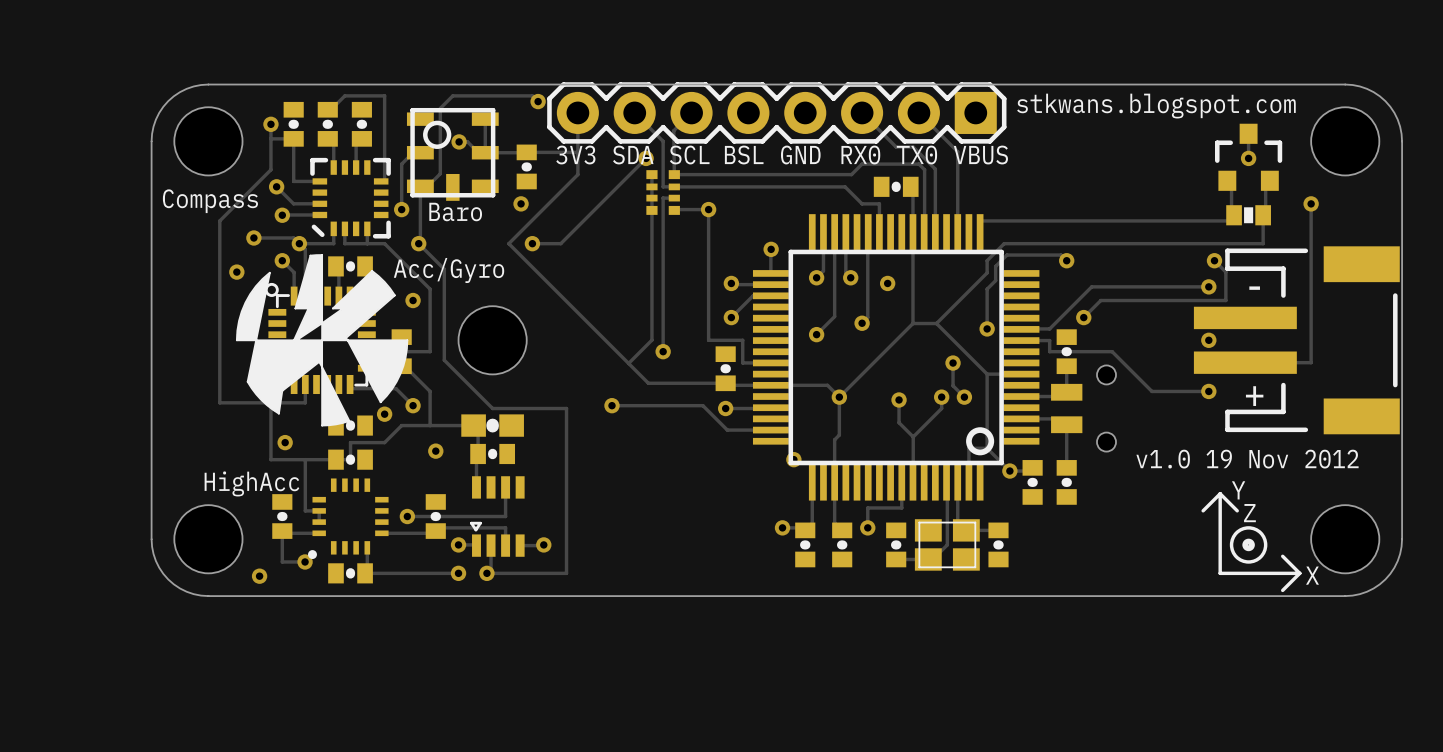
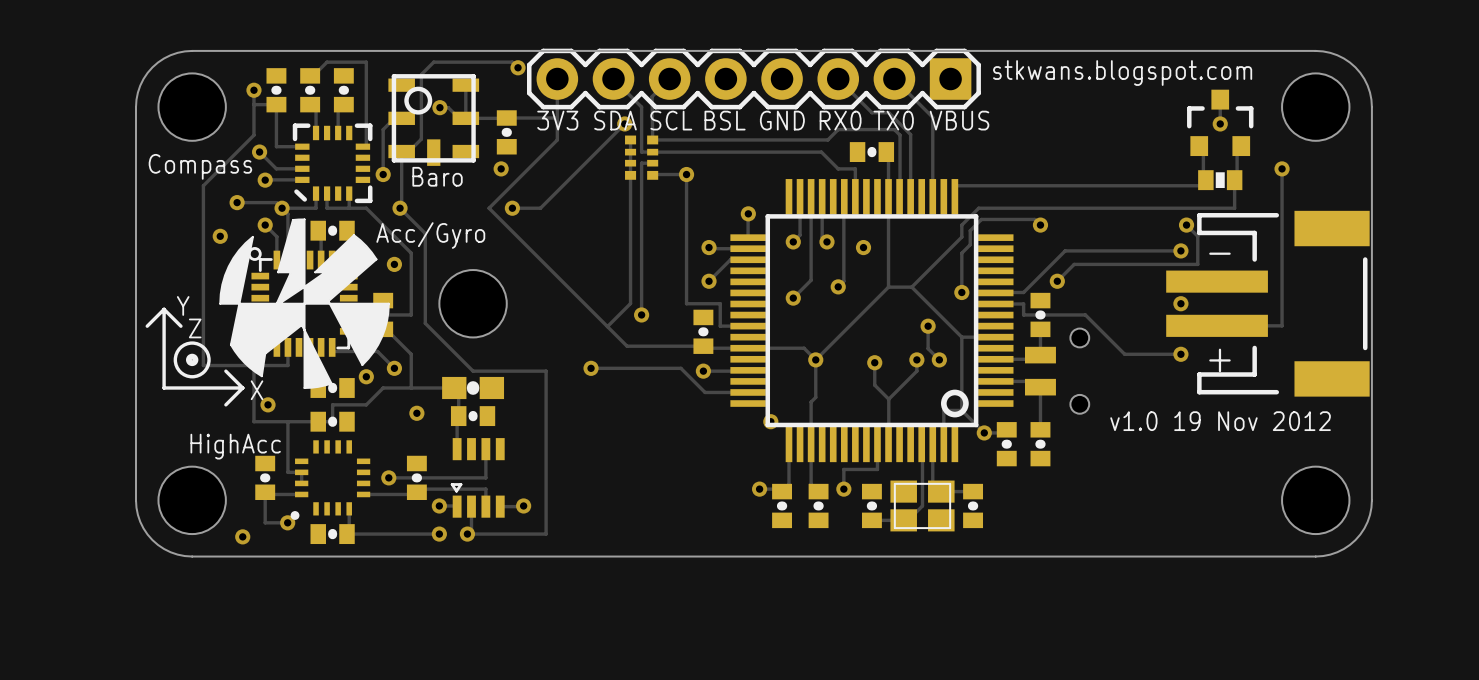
drawing: none -> [145, 307, 245, 407]
drawing: [1201, 492, 1302, 593] -> none

